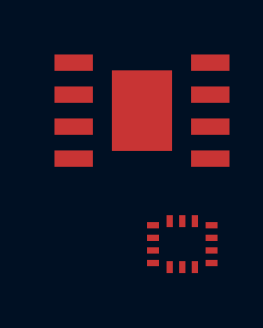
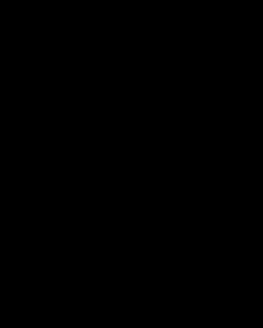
part: (141, 110) -> none
part: (182, 244) -> none

